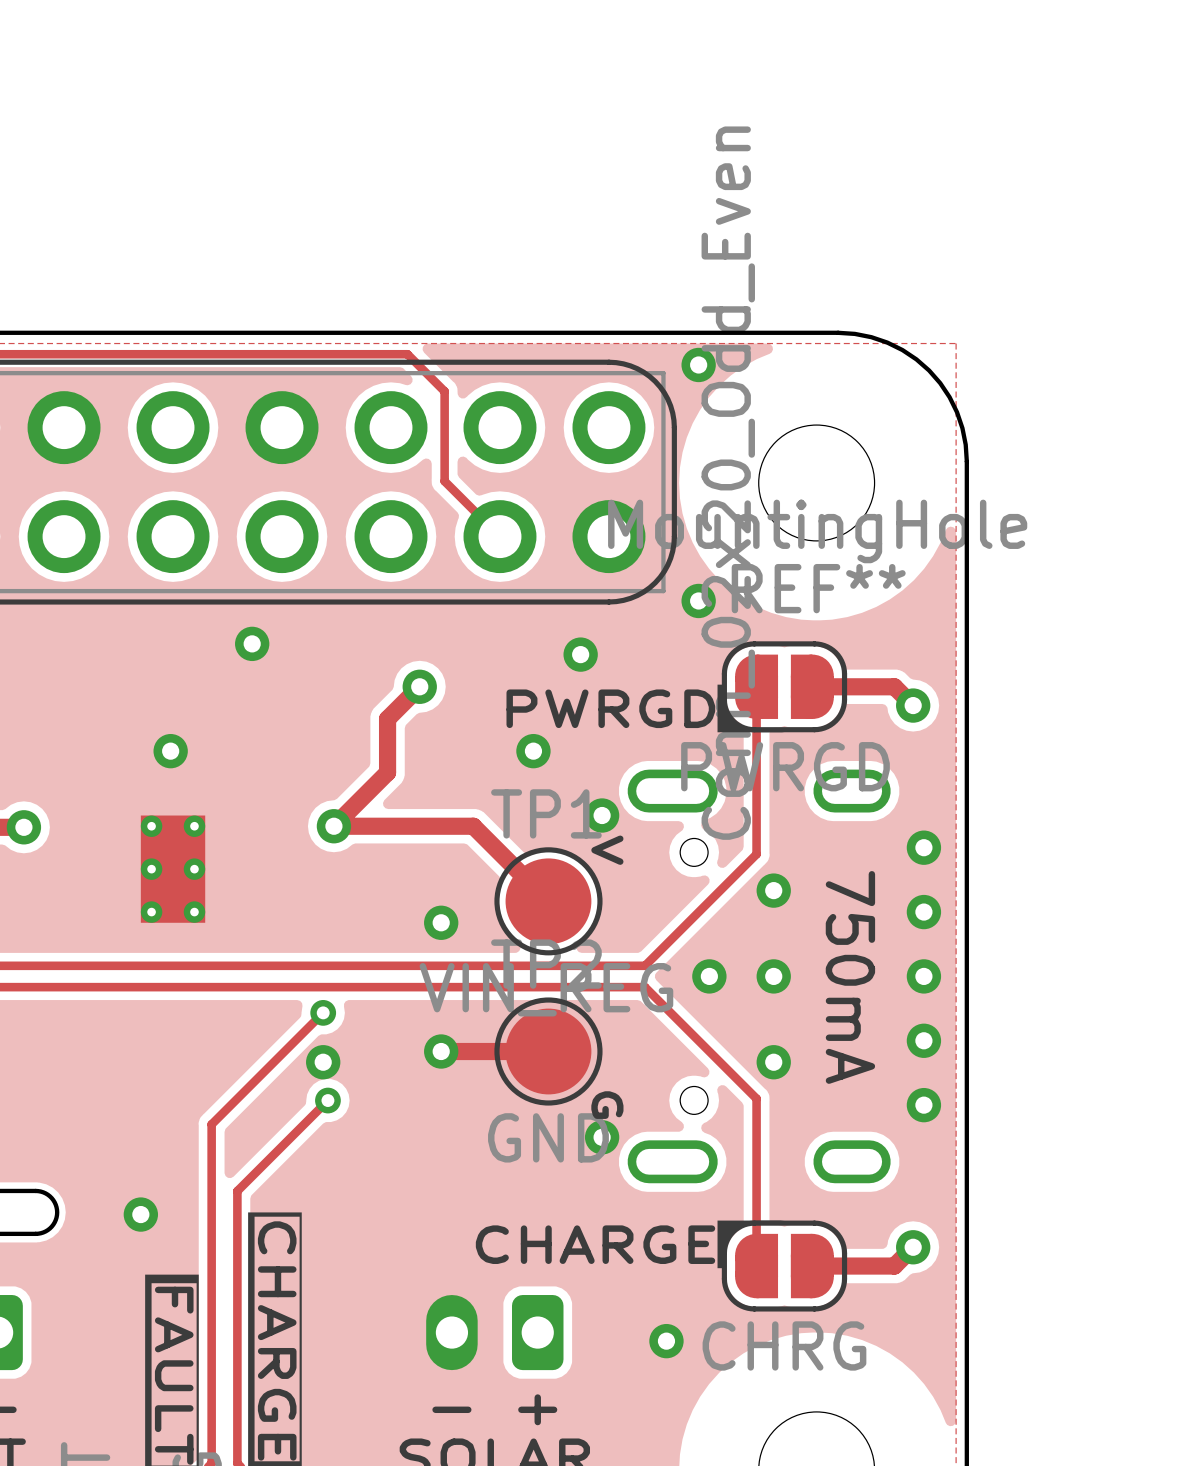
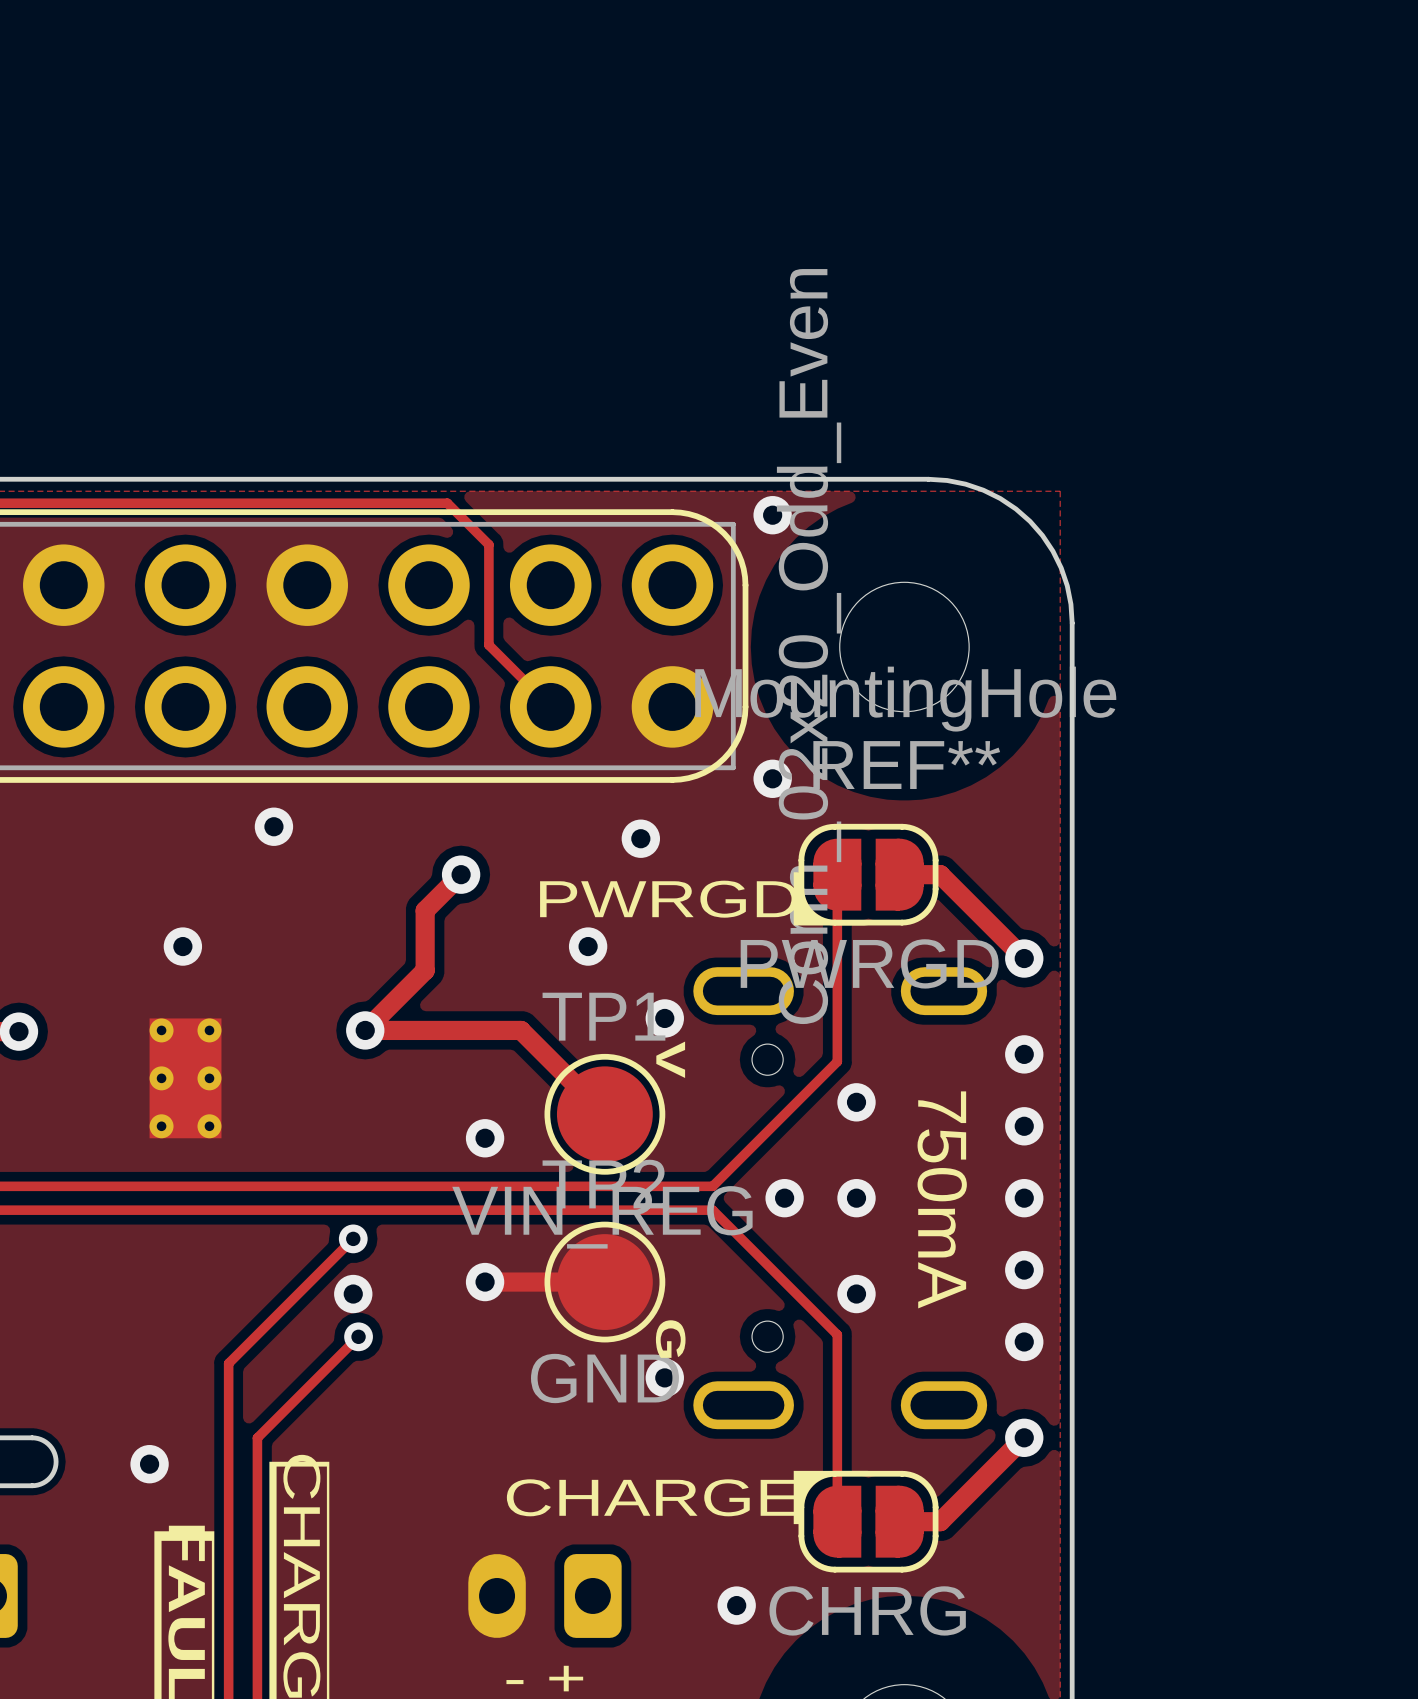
track: (848, 686) (894, 686) (913, 705) -> (940, 874) (1024, 958)
via position: (913, 705) -> (1024, 958)
track: (913, 1247) (894, 1266) (848, 1266) -> (1024, 1437) (940, 1521)
via position: (913, 1247) -> (1024, 1437)

